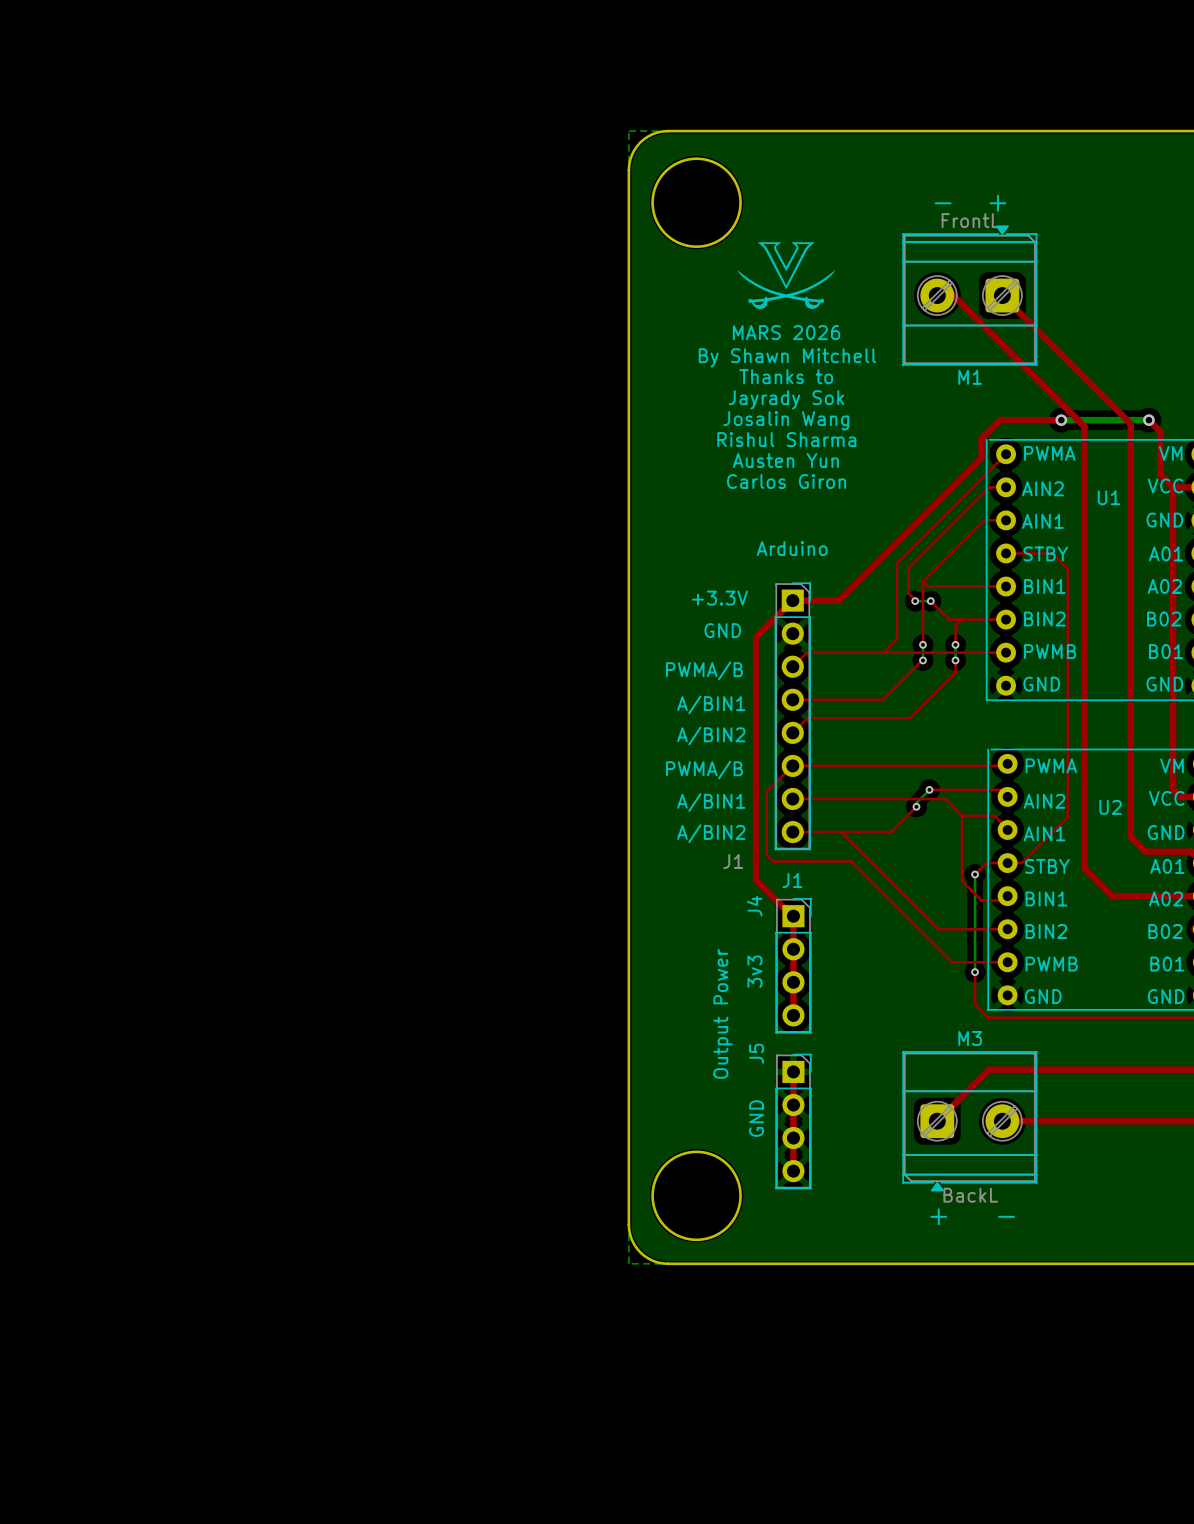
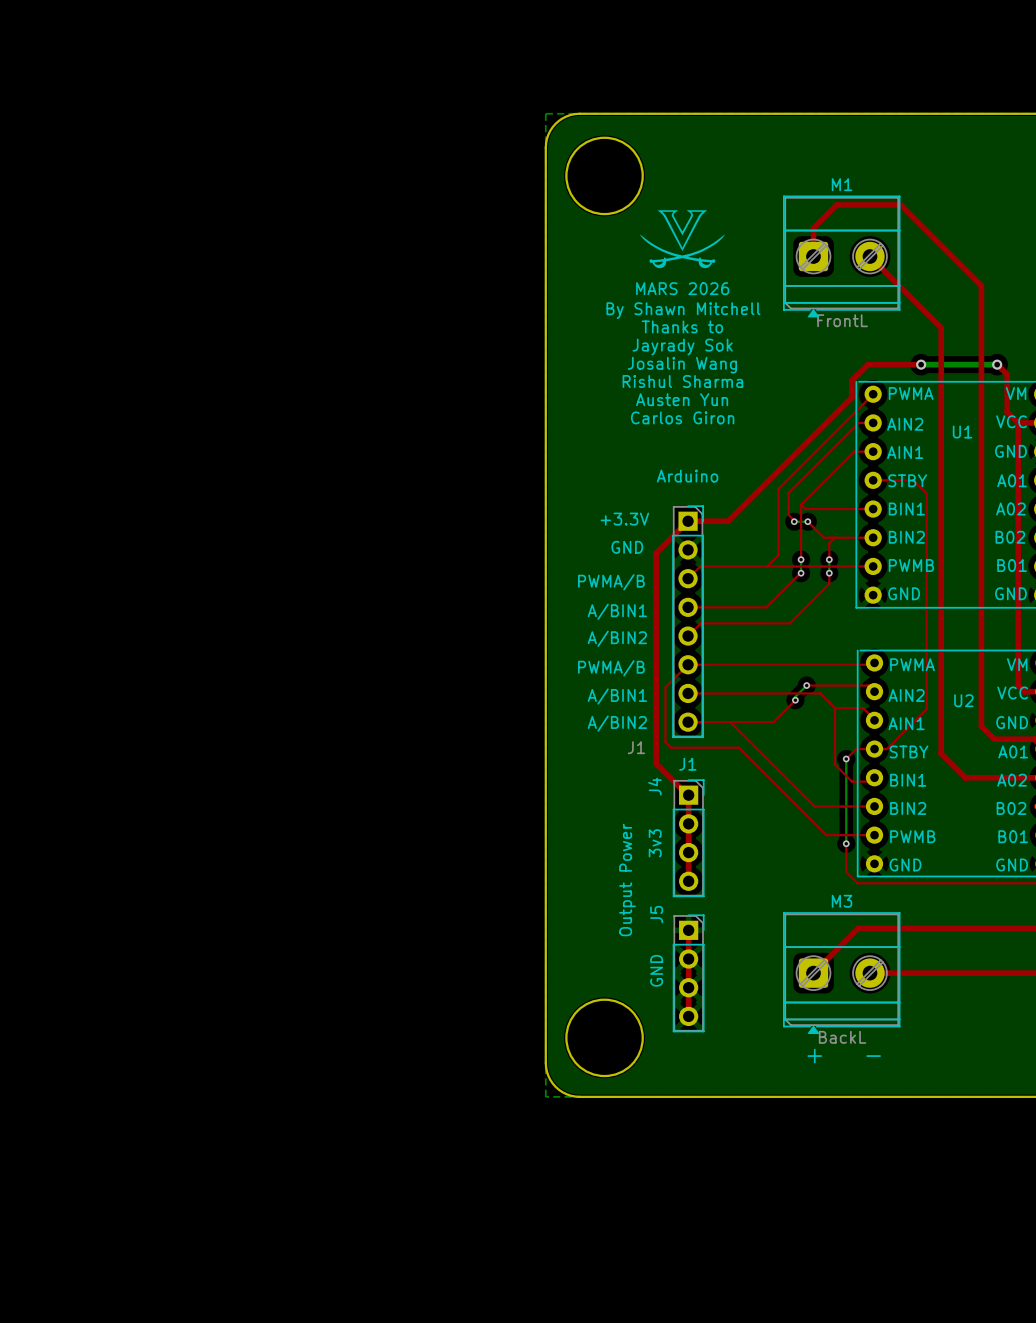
text: - (943, 203) -> none
text: + (997, 203) -> none
top track: (937, 295) (953, 295) (1084, 426) -> (813, 256) (813, 228) (836, 204) (900, 204) (981, 285) (981, 367)
M1 rotation: 0° (969, 295) -> 180° (841, 256)
top track: (1084, 377) (1130, 423) -> (941, 327) (941, 370)

